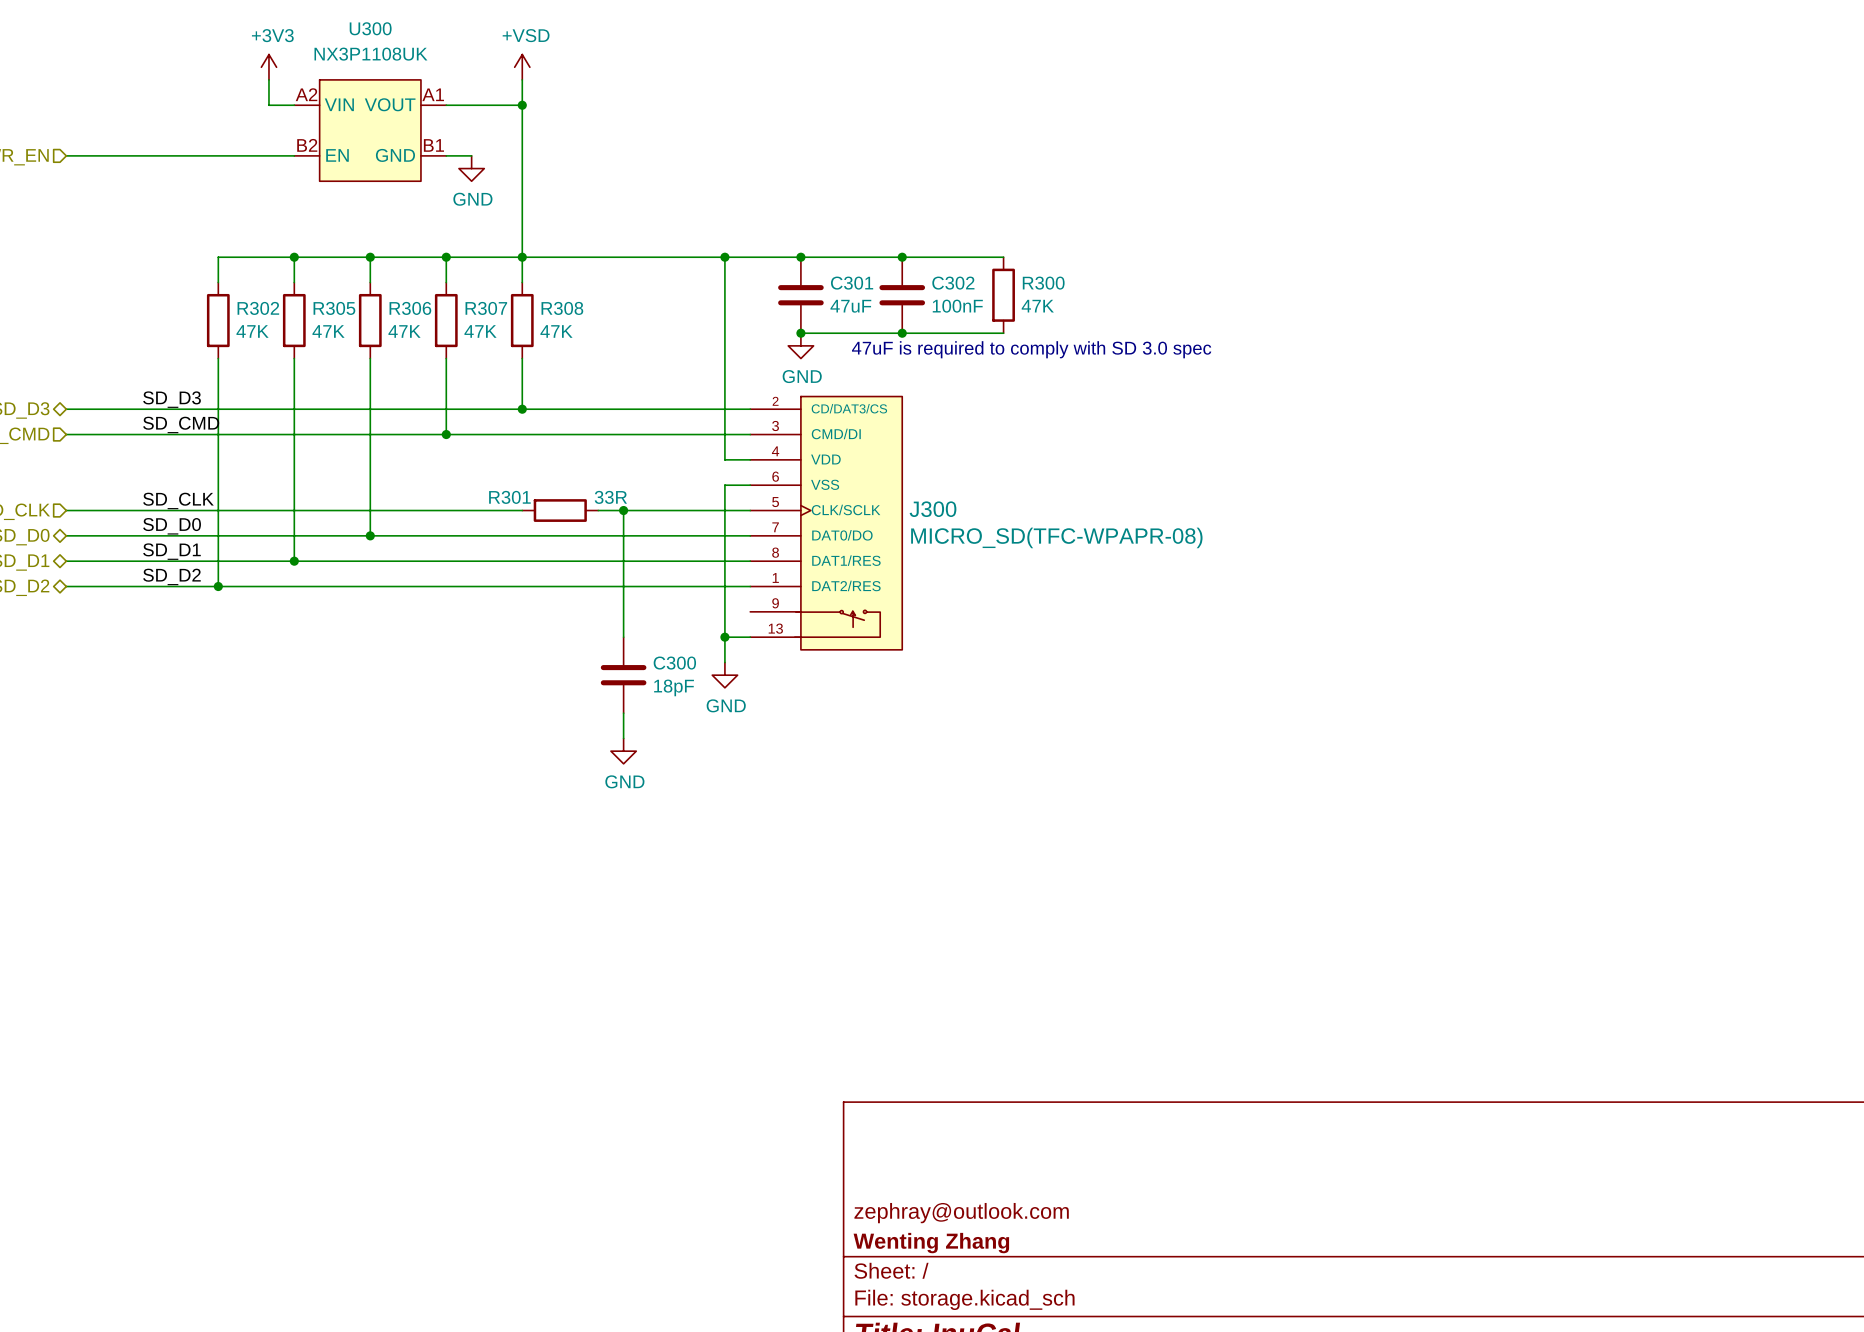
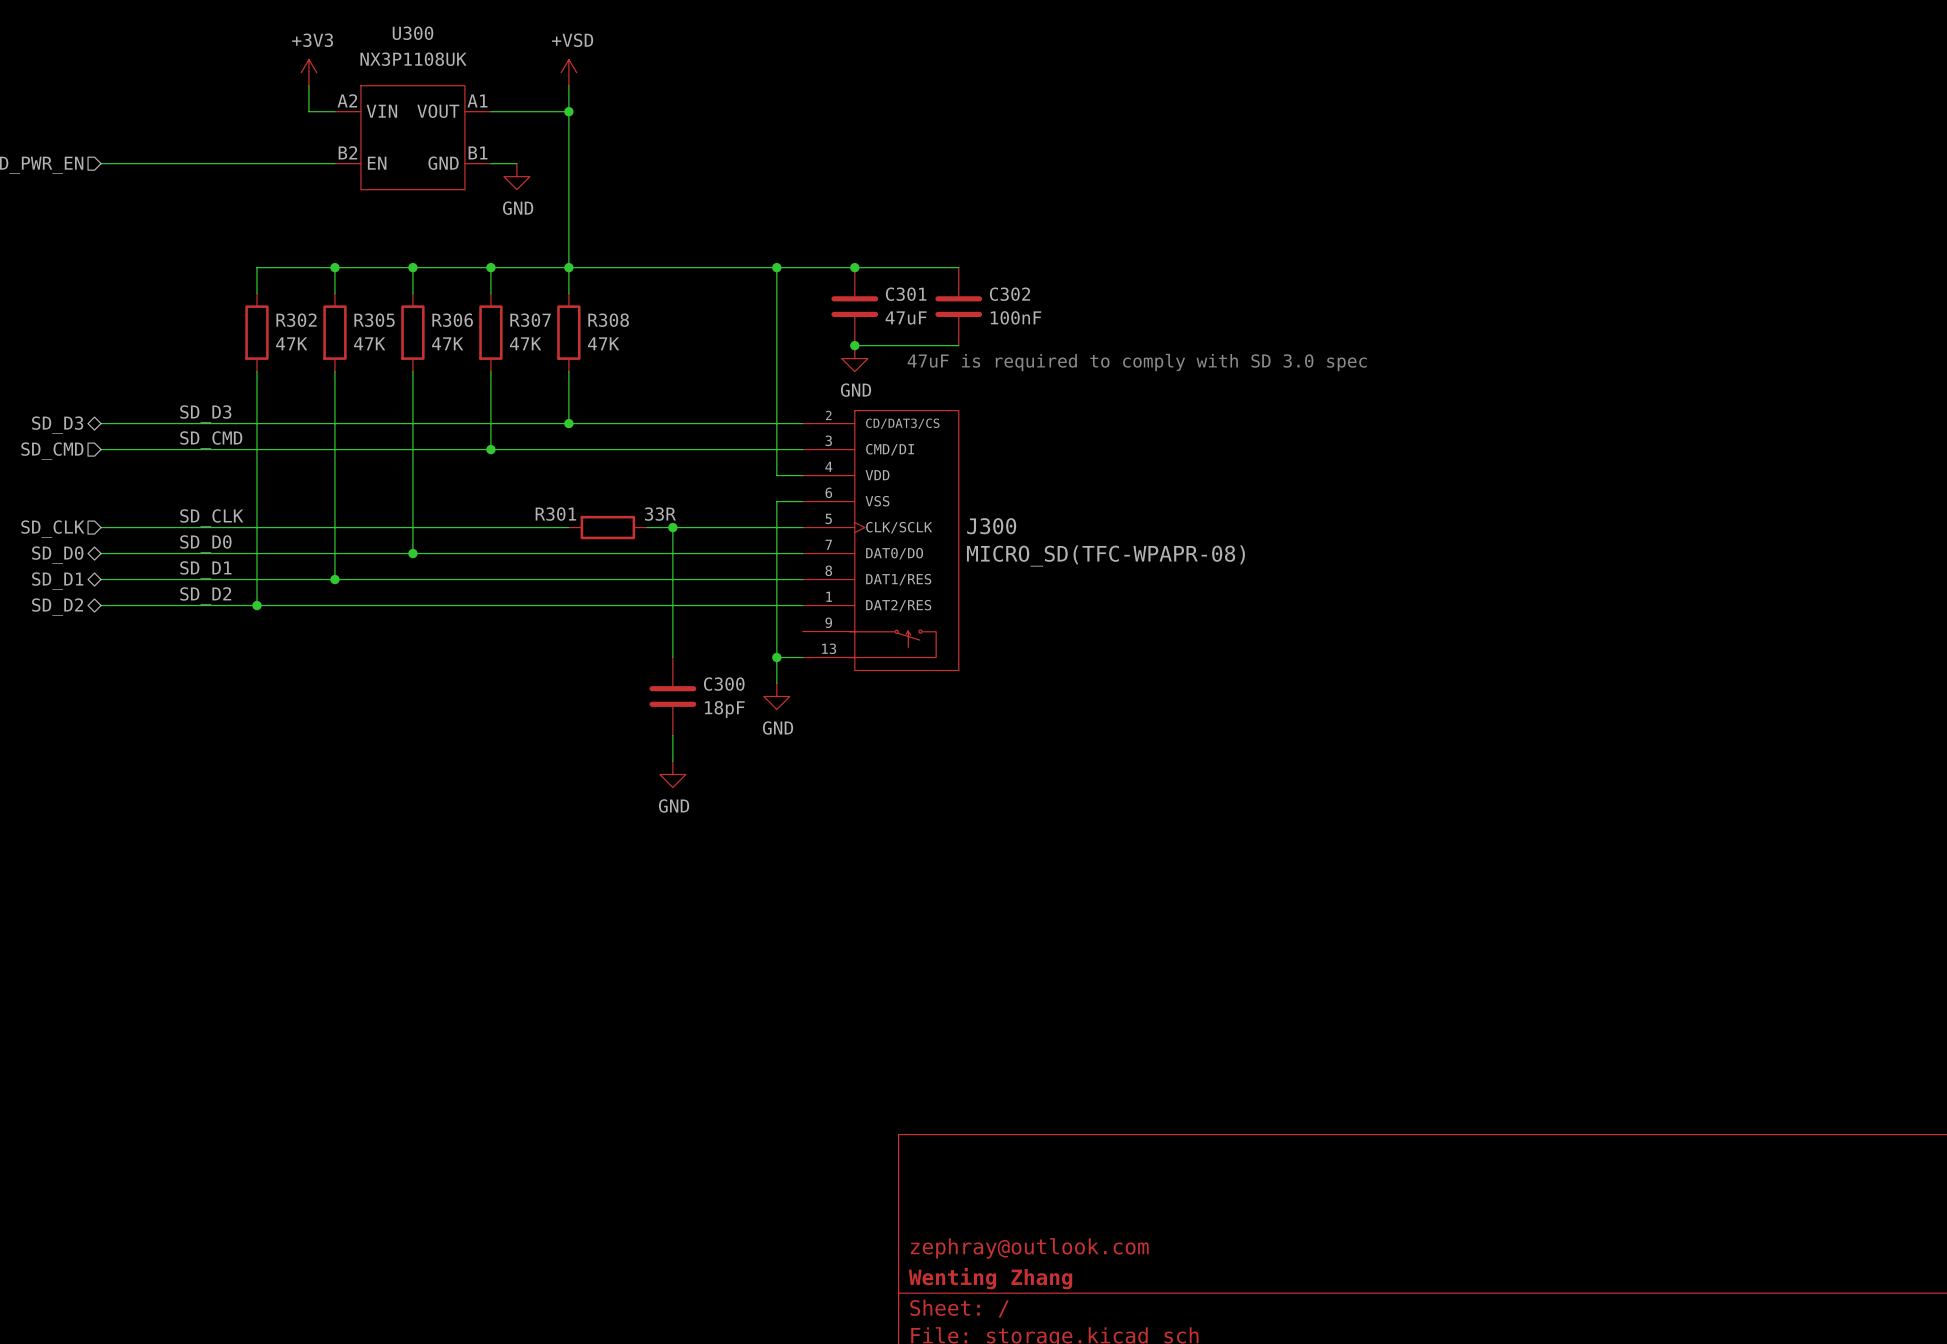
wire: (902, 257) (1003, 257) -> none
junction: (902, 257) -> none
R300: 47K (1003, 295) -> none
wire: (902, 333) (1003, 333) -> none
junction: (902, 333) -> none

